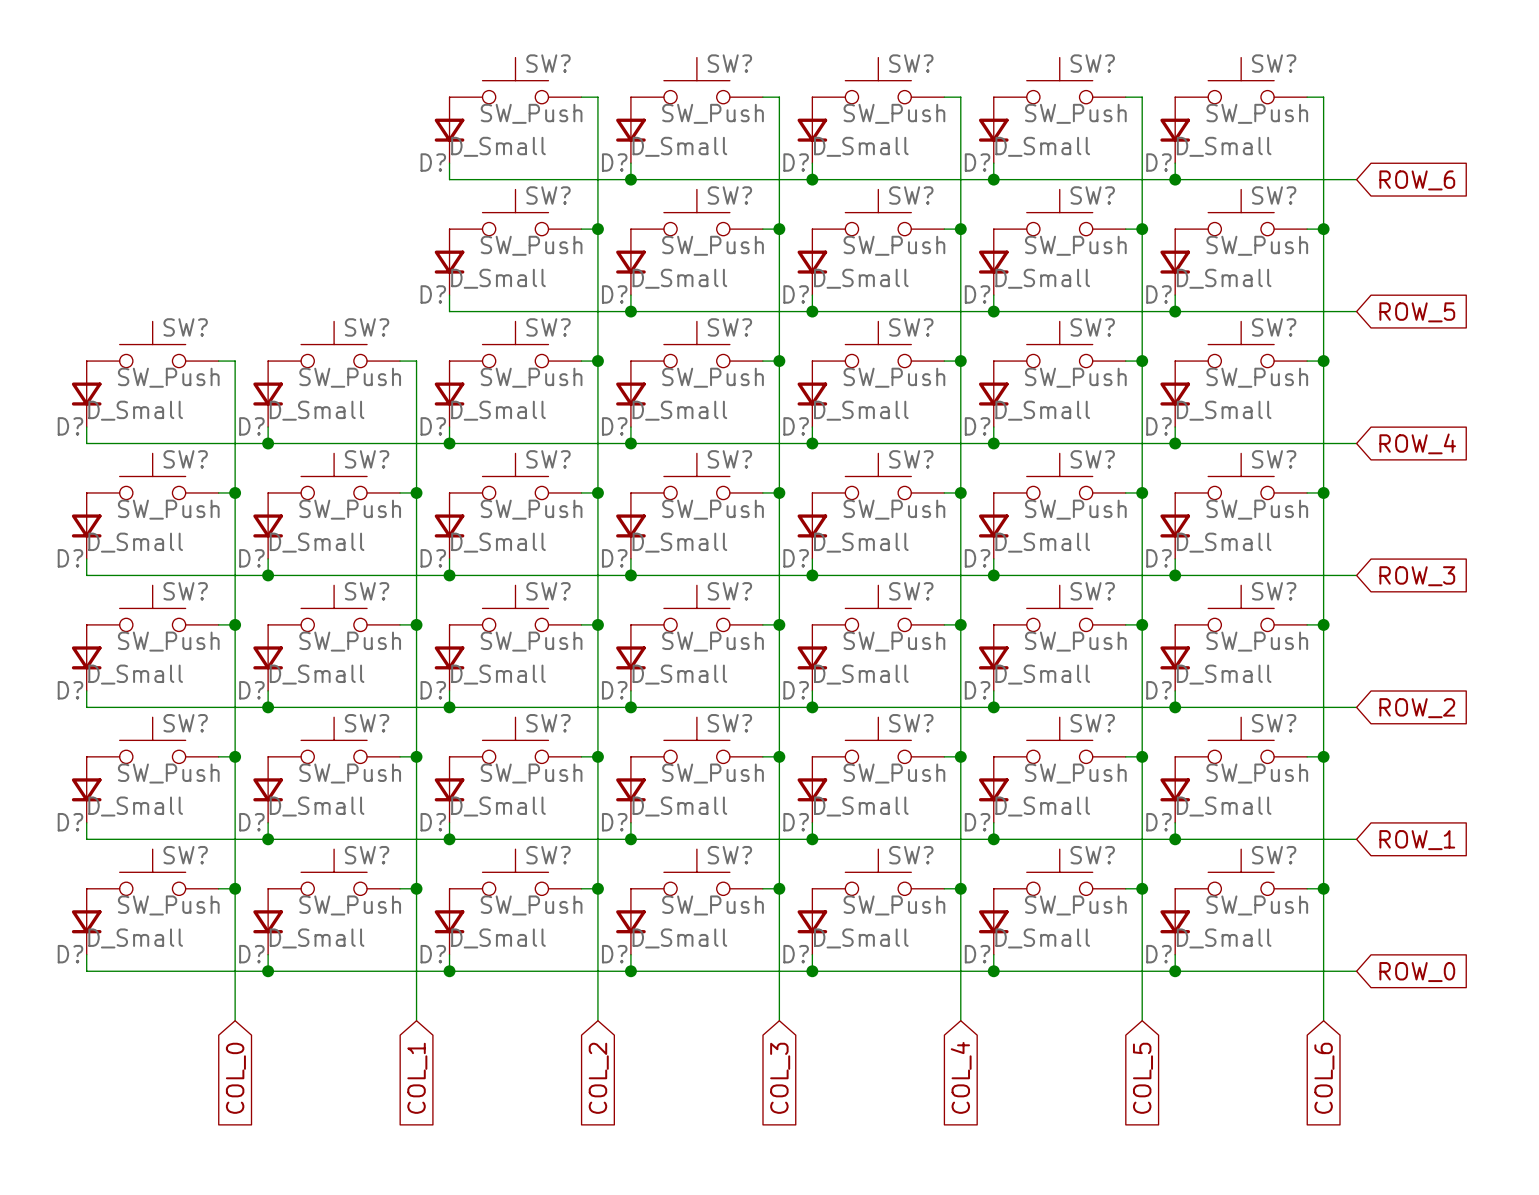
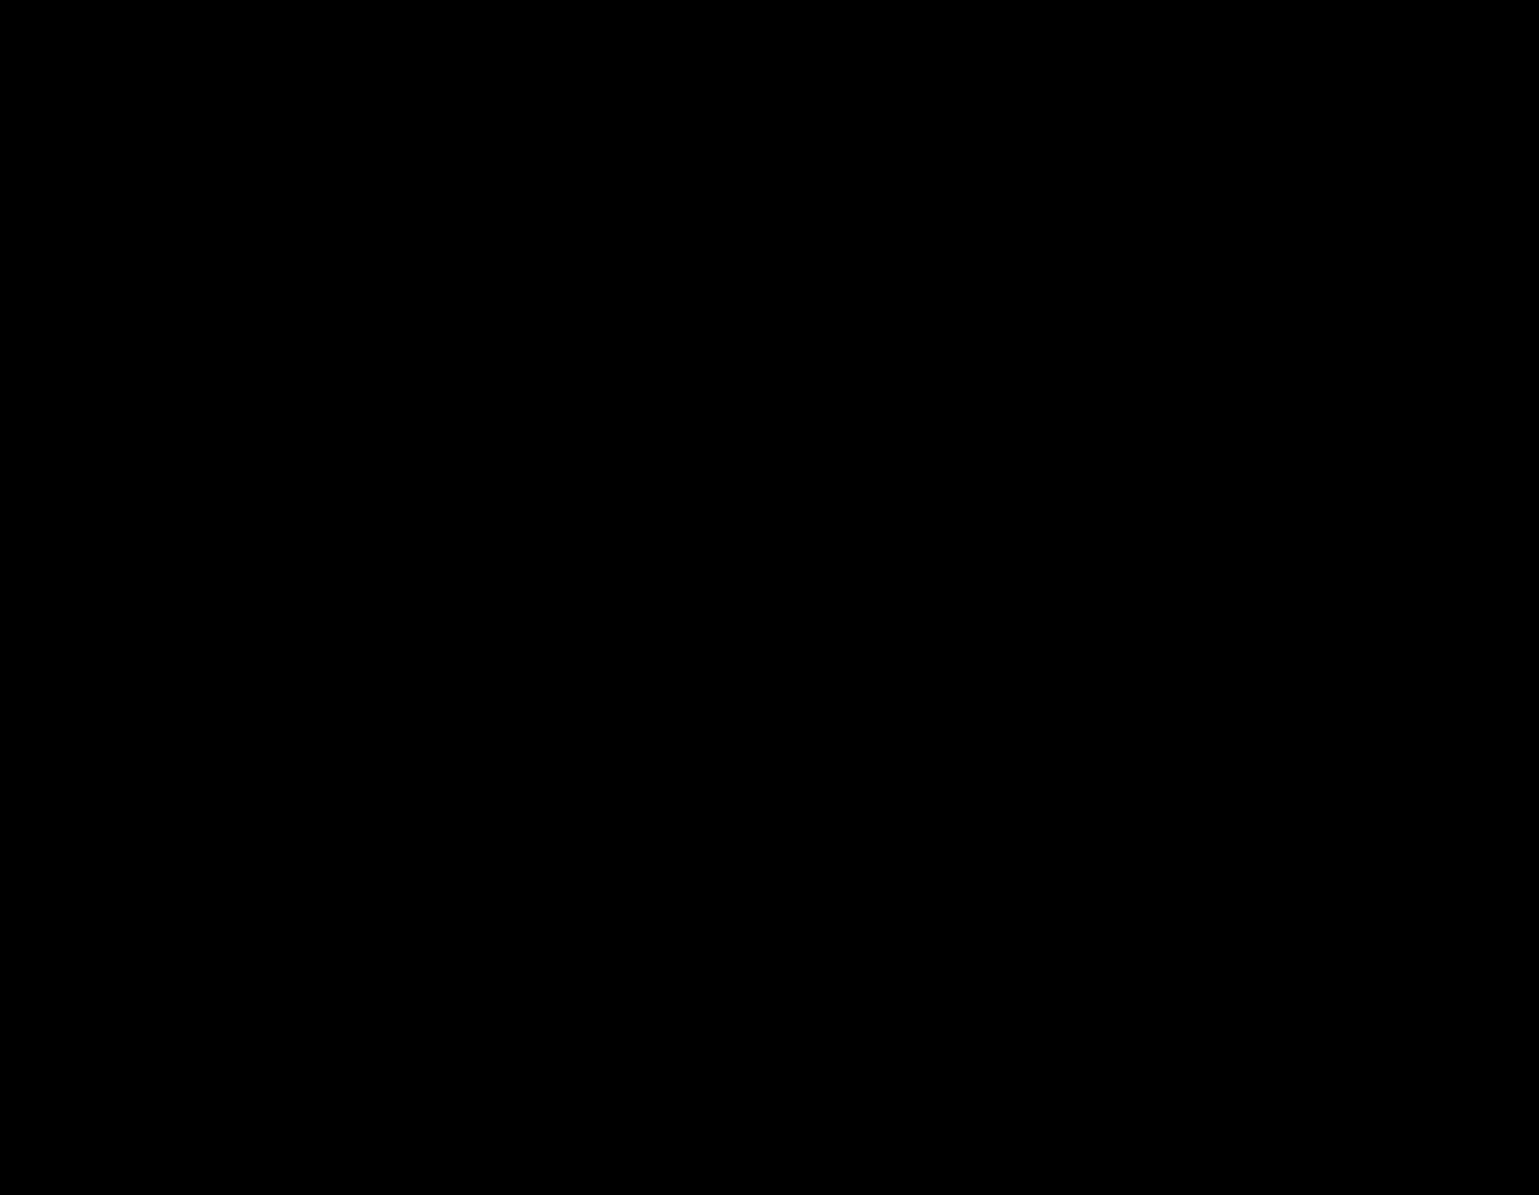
SW?: SW_Push (515, 80) -> none
SW?: SW_Push (696, 80) -> none
SW?: SW_Push (878, 80) -> none
SW?: SW_Push (1059, 80) -> none
SW?: SW_Push (1241, 80) -> none
wire: (581, 97) (597, 97) (597, 1020) -> none
wire: (762, 97) (779, 97) (779, 1020) -> none
wire: (944, 97) (960, 97) (960, 1020) -> none
wire: (1125, 97) (1142, 97) (1142, 1020) -> none
wire: (1307, 97) (1323, 97) (1323, 1020) -> none
D?: D_Small (449, 130) -> none
D?: D_Small (630, 130) -> none
D?: D_Small (812, 130) -> none
D?: D_Small (993, 130) -> none
D?: D_Small (1175, 130) -> none
wire: (449, 163) (449, 179) (1356, 179) -> none
wire: (630, 163) (630, 179) -> none
wire: (812, 163) (812, 179) -> none
wire: (993, 163) (993, 179) -> none
wire: (1175, 163) (1175, 179) -> none
junction: (630, 179) -> none
junction: (812, 179) -> none
junction: (993, 179) -> none
junction: (1175, 179) -> none
global label: ROW_6 (1417, 180) -> none
SW?: SW_Push (515, 212) -> none
SW?: SW_Push (696, 212) -> none
SW?: SW_Push (878, 212) -> none
SW?: SW_Push (1059, 212) -> none
SW?: SW_Push (1241, 212) -> none
wire: (581, 229) (597, 229) -> none
junction: (597, 229) -> none
wire: (762, 229) (779, 229) -> none
junction: (779, 229) -> none
wire: (944, 229) (960, 229) -> none
junction: (960, 229) -> none
wire: (1125, 229) (1142, 229) -> none
junction: (1142, 229) -> none
wire: (1307, 229) (1323, 229) -> none
junction: (1323, 229) -> none
D?: D_Small (449, 262) -> none
D?: D_Small (630, 262) -> none
D?: D_Small (812, 262) -> none
D?: D_Small (993, 262) -> none
D?: D_Small (1175, 262) -> none
wire: (449, 295) (449, 311) (1356, 311) -> none
wire: (630, 295) (630, 311) -> none
wire: (812, 295) (812, 311) -> none
wire: (993, 295) (993, 311) -> none
wire: (1175, 295) (1175, 311) -> none
junction: (630, 311) -> none
junction: (812, 311) -> none
junction: (993, 311) -> none
junction: (1175, 311) -> none
global label: ROW_5 (1417, 312) -> none
SW?: SW_Push (152, 344) -> none
SW?: SW_Push (334, 344) -> none
SW?: SW_Push (515, 344) -> none
SW?: SW_Push (696, 344) -> none
SW?: SW_Push (878, 344) -> none
SW?: SW_Push (1059, 344) -> none
SW?: SW_Push (1241, 344) -> none
wire: (218, 361) (235, 361) (235, 1020) -> none
wire: (400, 361) (416, 361) (416, 1020) -> none
wire: (581, 361) (597, 361) -> none
junction: (597, 361) -> none
wire: (762, 361) (779, 361) -> none
junction: (779, 361) -> none
wire: (944, 361) (960, 361) -> none
junction: (960, 361) -> none
wire: (1125, 361) (1142, 361) -> none
junction: (1142, 361) -> none
wire: (1307, 361) (1323, 361) -> none
junction: (1323, 361) -> none
D?: D_Small (86, 394) -> none
D?: D_Small (268, 394) -> none
D?: D_Small (449, 394) -> none
D?: D_Small (630, 394) -> none
D?: D_Small (812, 394) -> none
D?: D_Small (993, 394) -> none
D?: D_Small (1175, 394) -> none
wire: (86, 427) (86, 443) (1356, 443) -> none
wire: (268, 427) (268, 443) -> none
wire: (449, 427) (449, 443) -> none
wire: (630, 427) (630, 443) -> none
wire: (812, 427) (812, 443) -> none
wire: (993, 427) (993, 443) -> none
wire: (1175, 427) (1175, 443) -> none
junction: (268, 443) -> none
junction: (449, 443) -> none
junction: (630, 443) -> none
junction: (812, 443) -> none
junction: (993, 443) -> none
junction: (1175, 443) -> none
global label: ROW_4 (1417, 443) -> none
SW?: SW_Push (152, 476) -> none
SW?: SW_Push (334, 476) -> none
SW?: SW_Push (515, 476) -> none
SW?: SW_Push (696, 476) -> none
SW?: SW_Push (878, 476) -> none
SW?: SW_Push (1059, 476) -> none
SW?: SW_Push (1241, 476) -> none
wire: (218, 492) (235, 492) -> none
junction: (235, 492) -> none
wire: (400, 492) (416, 492) -> none
junction: (416, 492) -> none
wire: (581, 492) (597, 492) -> none
junction: (597, 492) -> none
wire: (762, 492) (779, 492) -> none
junction: (779, 492) -> none
wire: (944, 492) (960, 492) -> none
junction: (960, 492) -> none
wire: (1125, 492) (1142, 492) -> none
junction: (1142, 492) -> none
wire: (1307, 492) (1323, 492) -> none
junction: (1323, 492) -> none
D?: D_Small (86, 525) -> none
D?: D_Small (268, 525) -> none
D?: D_Small (449, 525) -> none
D?: D_Small (630, 525) -> none
D?: D_Small (812, 525) -> none
D?: D_Small (993, 525) -> none
D?: D_Small (1175, 525) -> none
wire: (86, 558) (86, 575) (1356, 575) -> none
wire: (268, 558) (268, 575) -> none
wire: (449, 558) (449, 575) -> none
wire: (630, 558) (630, 575) -> none
wire: (812, 558) (812, 575) -> none
wire: (993, 558) (993, 575) -> none
wire: (1175, 558) (1175, 575) -> none
junction: (268, 575) -> none
junction: (449, 575) -> none
junction: (630, 575) -> none
junction: (812, 575) -> none
junction: (993, 575) -> none
junction: (1175, 575) -> none
global label: ROW_3 (1417, 576) -> none
SW?: SW_Push (152, 608) -> none
SW?: SW_Push (334, 608) -> none
SW?: SW_Push (515, 608) -> none
SW?: SW_Push (696, 608) -> none
SW?: SW_Push (878, 608) -> none
SW?: SW_Push (1059, 608) -> none
SW?: SW_Push (1241, 608) -> none
wire: (218, 624) (235, 624) -> none
junction: (235, 624) -> none
wire: (400, 624) (416, 624) -> none
junction: (416, 624) -> none
wire: (581, 624) (597, 624) -> none
junction: (597, 624) -> none
wire: (762, 624) (779, 624) -> none
junction: (779, 624) -> none
wire: (944, 624) (960, 624) -> none
junction: (960, 624) -> none
wire: (1125, 624) (1142, 624) -> none
junction: (1142, 624) -> none
wire: (1307, 624) (1323, 624) -> none
junction: (1323, 624) -> none
D?: D_Small (86, 657) -> none
D?: D_Small (268, 657) -> none
D?: D_Small (449, 657) -> none
D?: D_Small (630, 657) -> none
D?: D_Small (812, 657) -> none
D?: D_Small (993, 657) -> none
D?: D_Small (1175, 657) -> none
wire: (86, 690) (86, 707) (1356, 707) -> none
wire: (268, 690) (268, 707) -> none
wire: (449, 690) (449, 707) -> none
wire: (630, 690) (630, 707) -> none
wire: (812, 690) (812, 707) -> none
wire: (993, 690) (993, 707) -> none
wire: (1175, 690) (1175, 707) -> none
junction: (268, 707) -> none
junction: (449, 707) -> none
junction: (630, 707) -> none
junction: (812, 707) -> none
junction: (993, 707) -> none
junction: (1175, 707) -> none
global label: ROW_2 (1417, 708) -> none
SW?: SW_Push (152, 740) -> none
SW?: SW_Push (334, 740) -> none
SW?: SW_Push (515, 740) -> none
SW?: SW_Push (696, 740) -> none
SW?: SW_Push (878, 740) -> none
SW?: SW_Push (1059, 740) -> none
SW?: SW_Push (1241, 740) -> none
wire: (218, 756) (235, 756) -> none
junction: (235, 756) -> none
wire: (400, 756) (416, 756) -> none
junction: (416, 756) -> none
wire: (581, 756) (597, 756) -> none
junction: (597, 756) -> none
wire: (762, 756) (779, 756) -> none
junction: (779, 756) -> none
wire: (944, 756) (960, 756) -> none
junction: (960, 756) -> none
wire: (1125, 756) (1142, 756) -> none
junction: (1142, 756) -> none
wire: (1307, 756) (1323, 756) -> none
junction: (1323, 756) -> none
D?: D_Small (86, 789) -> none
D?: D_Small (268, 789) -> none
D?: D_Small (449, 789) -> none
D?: D_Small (630, 789) -> none
D?: D_Small (812, 789) -> none
D?: D_Small (993, 789) -> none
D?: D_Small (1175, 789) -> none
wire: (86, 822) (86, 839) (1356, 839) -> none
wire: (268, 822) (268, 839) -> none
wire: (449, 822) (449, 839) -> none
wire: (630, 822) (630, 839) -> none
wire: (812, 822) (812, 839) -> none
wire: (993, 822) (993, 839) -> none
wire: (1175, 822) (1175, 839) -> none
junction: (268, 839) -> none
junction: (449, 839) -> none
junction: (630, 839) -> none
junction: (812, 839) -> none
junction: (993, 839) -> none
junction: (1175, 839) -> none
global label: ROW_1 (1417, 840) -> none
SW?: SW_Push (152, 872) -> none
SW?: SW_Push (334, 872) -> none
SW?: SW_Push (515, 872) -> none
SW?: SW_Push (696, 872) -> none
SW?: SW_Push (878, 872) -> none
SW?: SW_Push (1059, 872) -> none
SW?: SW_Push (1241, 872) -> none
wire: (218, 888) (235, 888) -> none
junction: (235, 888) -> none
wire: (400, 888) (416, 888) -> none
junction: (416, 888) -> none
wire: (581, 888) (597, 888) -> none
junction: (597, 888) -> none
wire: (762, 888) (779, 888) -> none
junction: (779, 888) -> none
wire: (944, 888) (960, 888) -> none
junction: (960, 888) -> none
wire: (1125, 888) (1142, 888) -> none
junction: (1142, 888) -> none
wire: (1307, 888) (1323, 888) -> none
junction: (1323, 888) -> none
D?: D_Small (86, 921) -> none
D?: D_Small (268, 921) -> none
D?: D_Small (449, 921) -> none
D?: D_Small (630, 921) -> none
D?: D_Small (812, 921) -> none
D?: D_Small (993, 921) -> none
D?: D_Small (1175, 921) -> none
wire: (86, 954) (86, 971) (1356, 971) -> none
wire: (268, 954) (268, 971) -> none
wire: (449, 954) (449, 971) -> none
wire: (630, 954) (630, 971) -> none
wire: (812, 954) (812, 971) -> none
wire: (993, 954) (993, 971) -> none
wire: (1175, 954) (1175, 971) -> none
junction: (268, 971) -> none
junction: (449, 971) -> none
junction: (630, 971) -> none
junction: (812, 971) -> none
junction: (993, 971) -> none
junction: (1175, 971) -> none
global label: ROW_0 (1417, 972) -> none
global label: COL_4 (961, 1077) -> none
global label: COL_0 (235, 1078) -> none
global label: COL_1 (417, 1078) -> none
global label: COL_2 (598, 1078) -> none
global label: COL_3 (780, 1078) -> none
global label: COL_5 (1142, 1078) -> none
global label: COL_6 (1324, 1078) -> none

